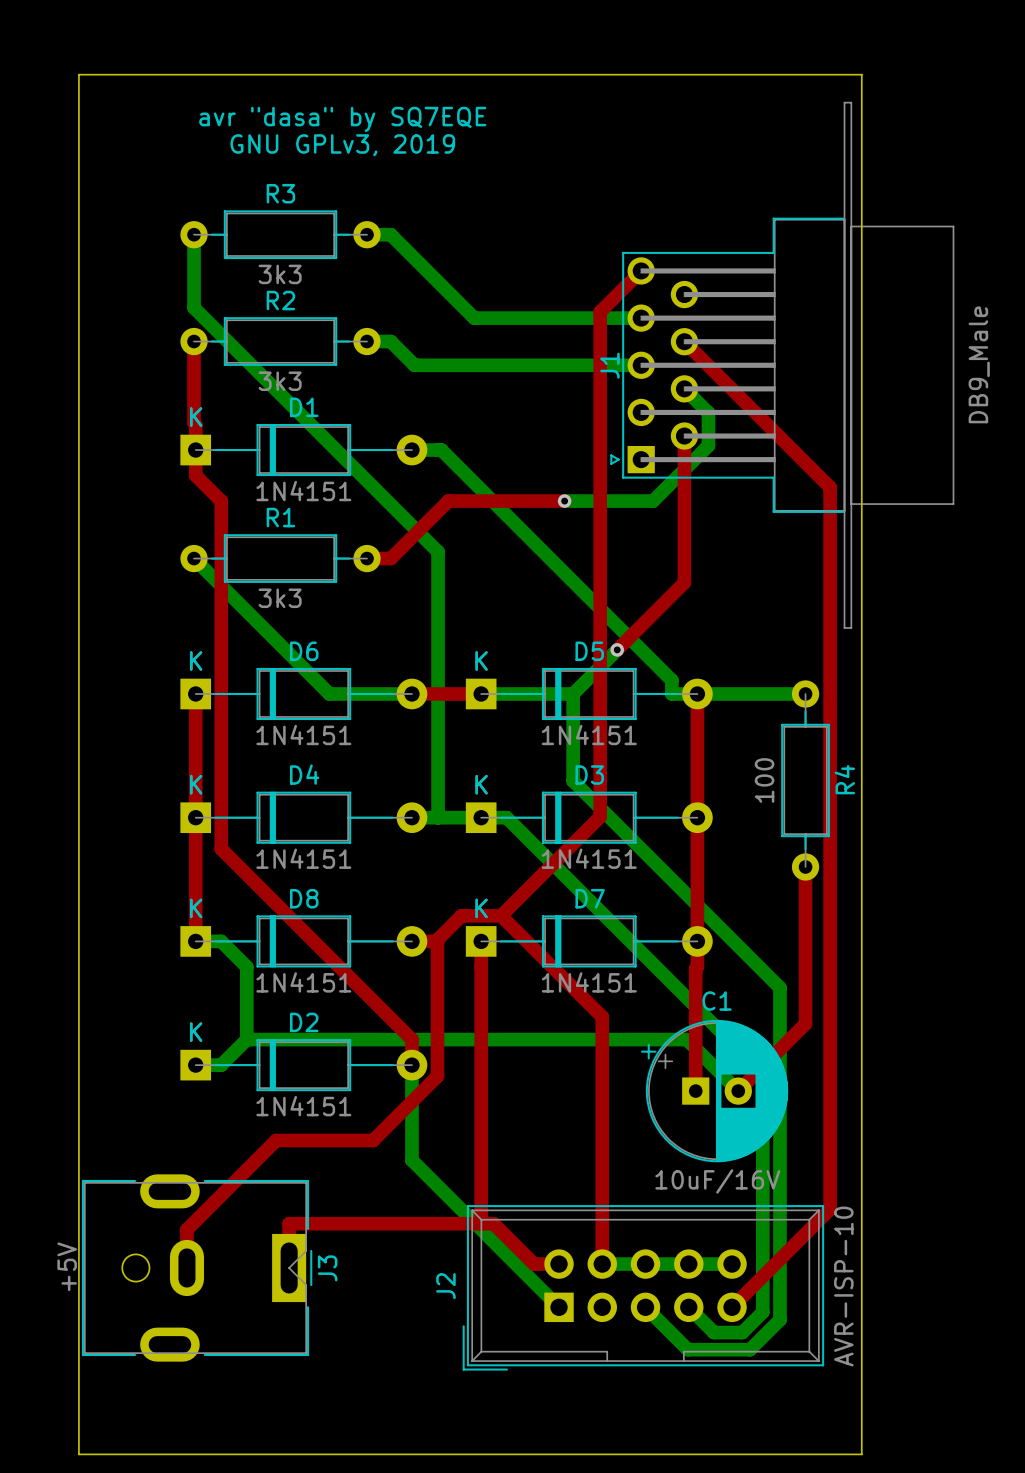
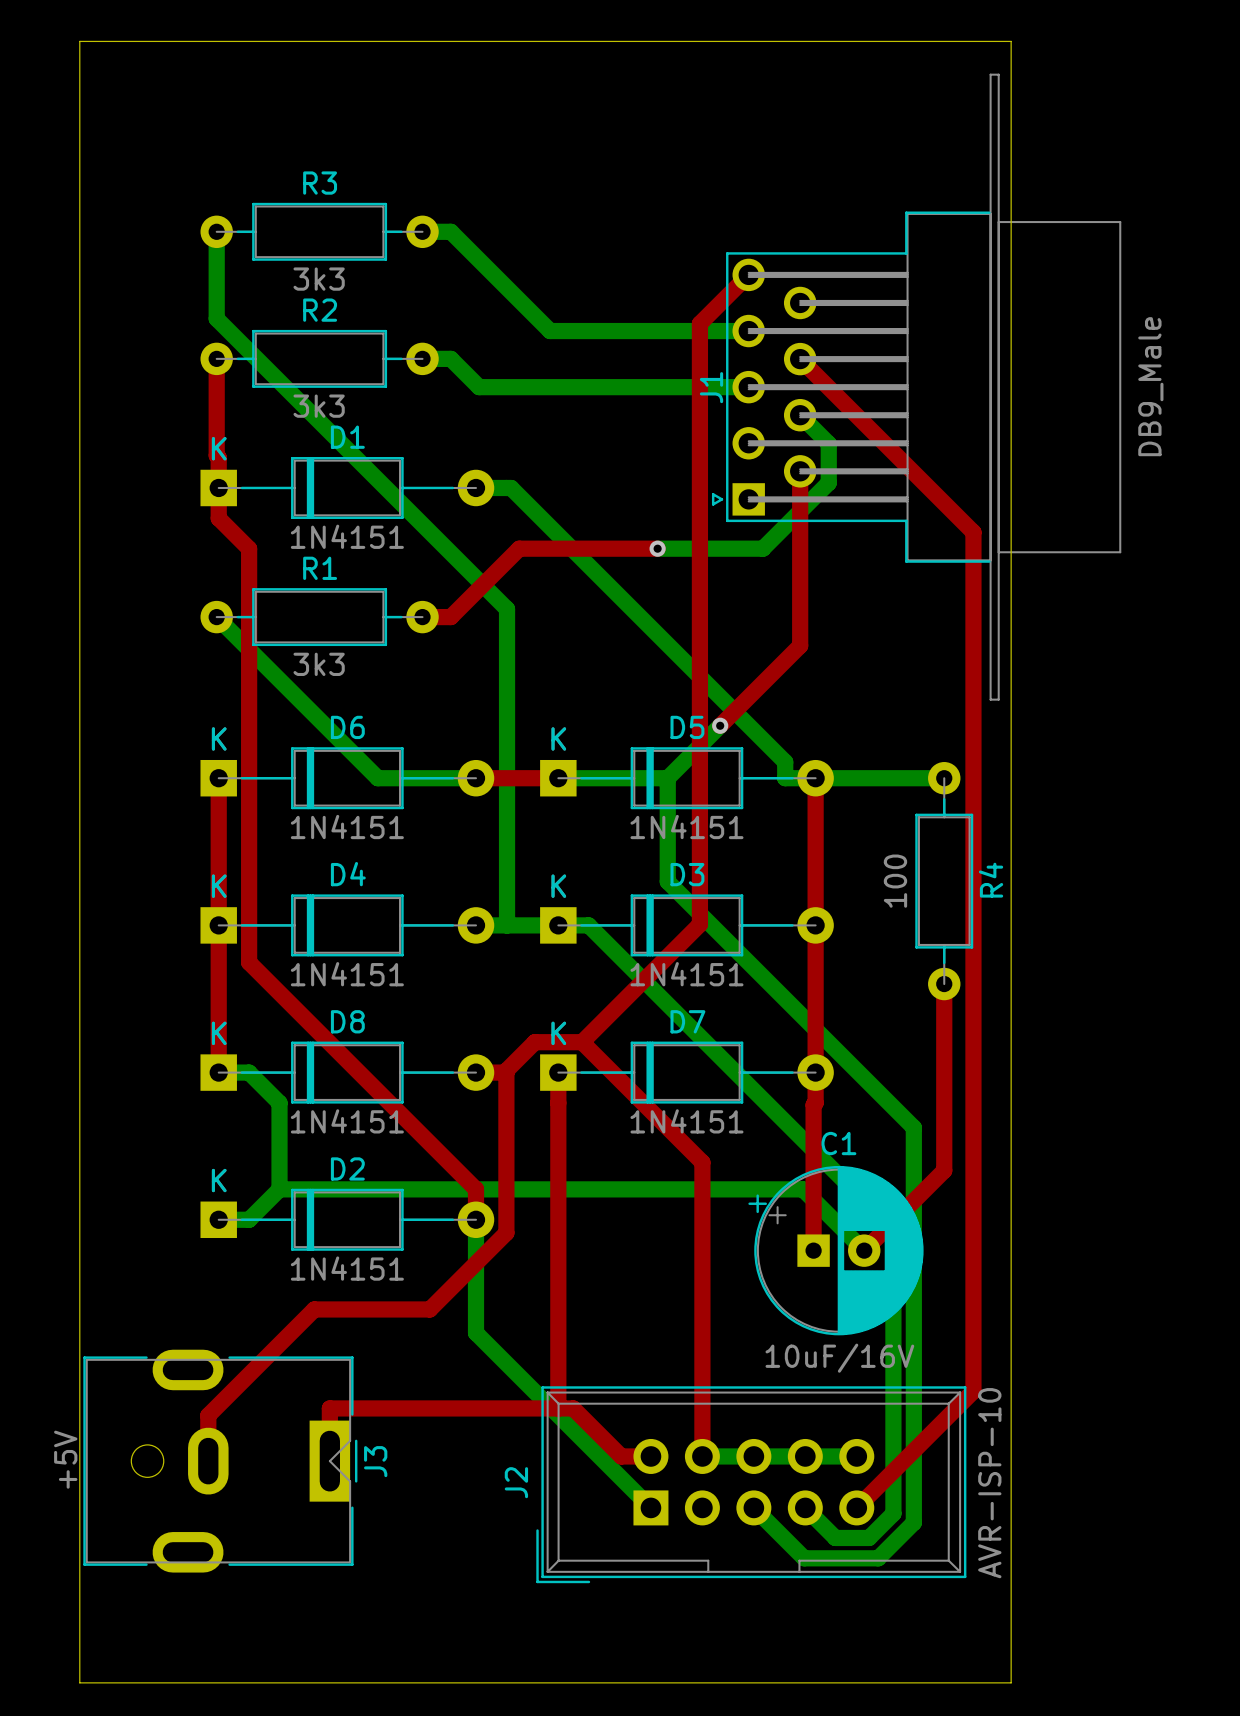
text: avr "dasa" by SQ7EQE (342, 119) -> none
text: GNU GPLv3, 2019 (342, 145) -> none

